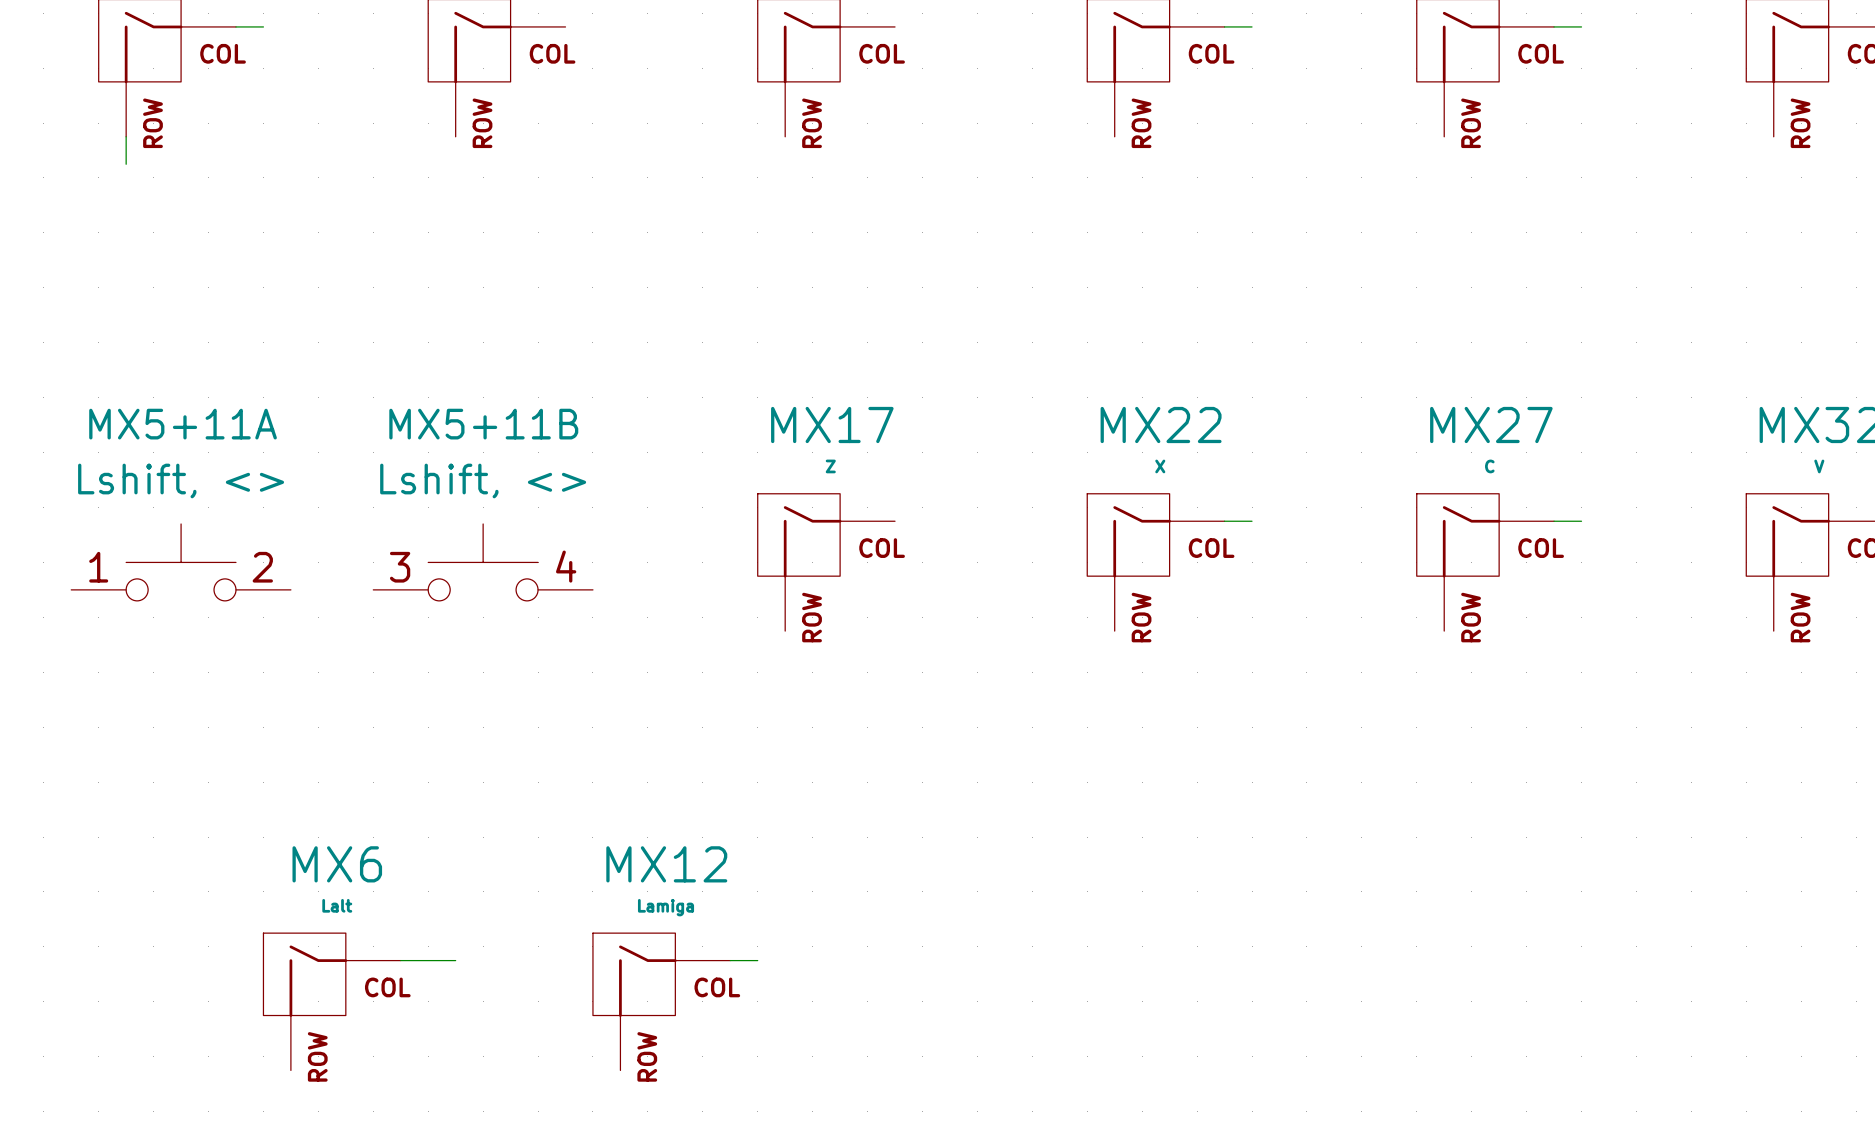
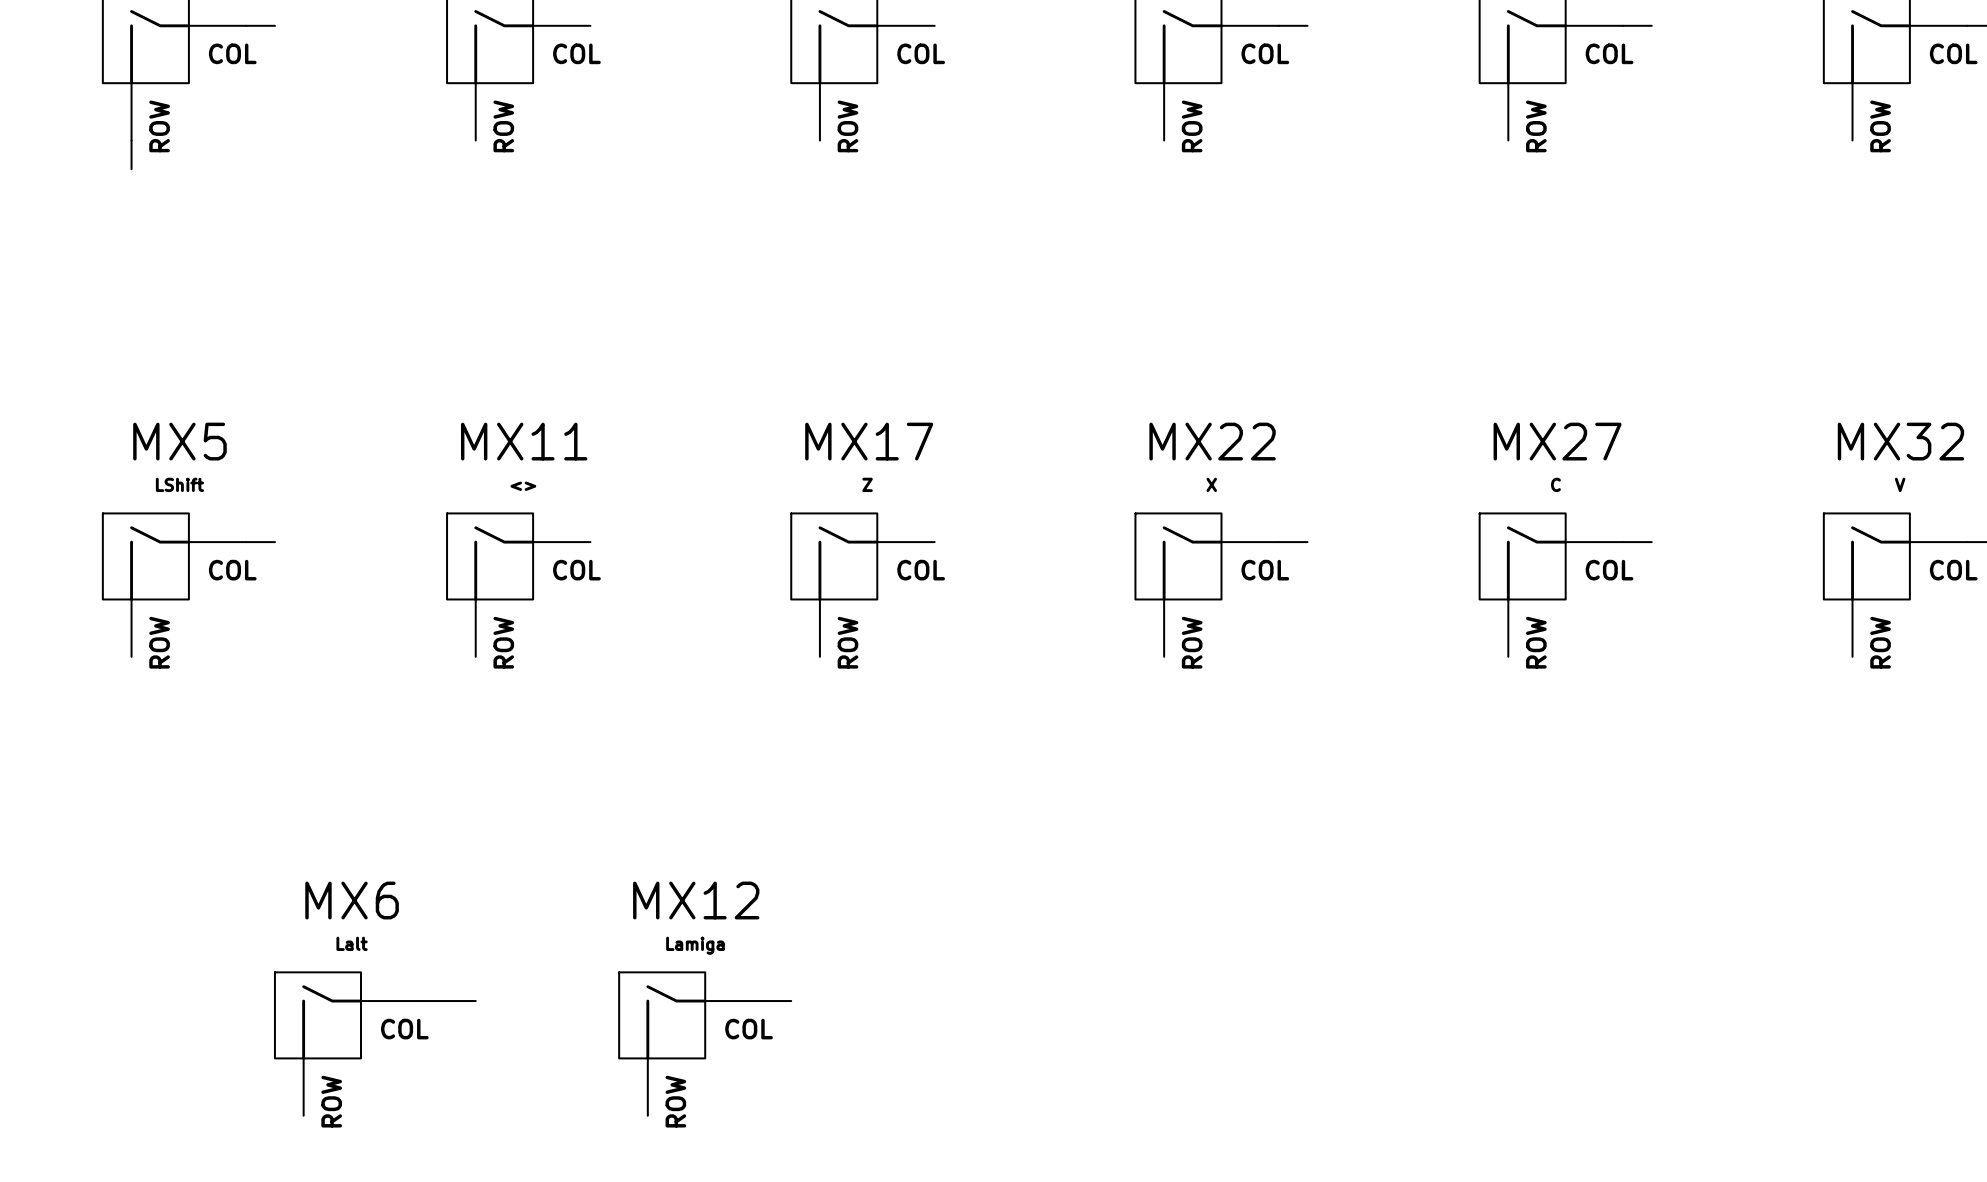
wire: none -> (246, 542) (274, 542)
MX5: none -> LShift (174, 585)
MX5+11A: Lshift, <> (181, 562) -> none
MX5+11B: Lshift, <> (483, 562) -> none
MX11: none -> <> (518, 585)

